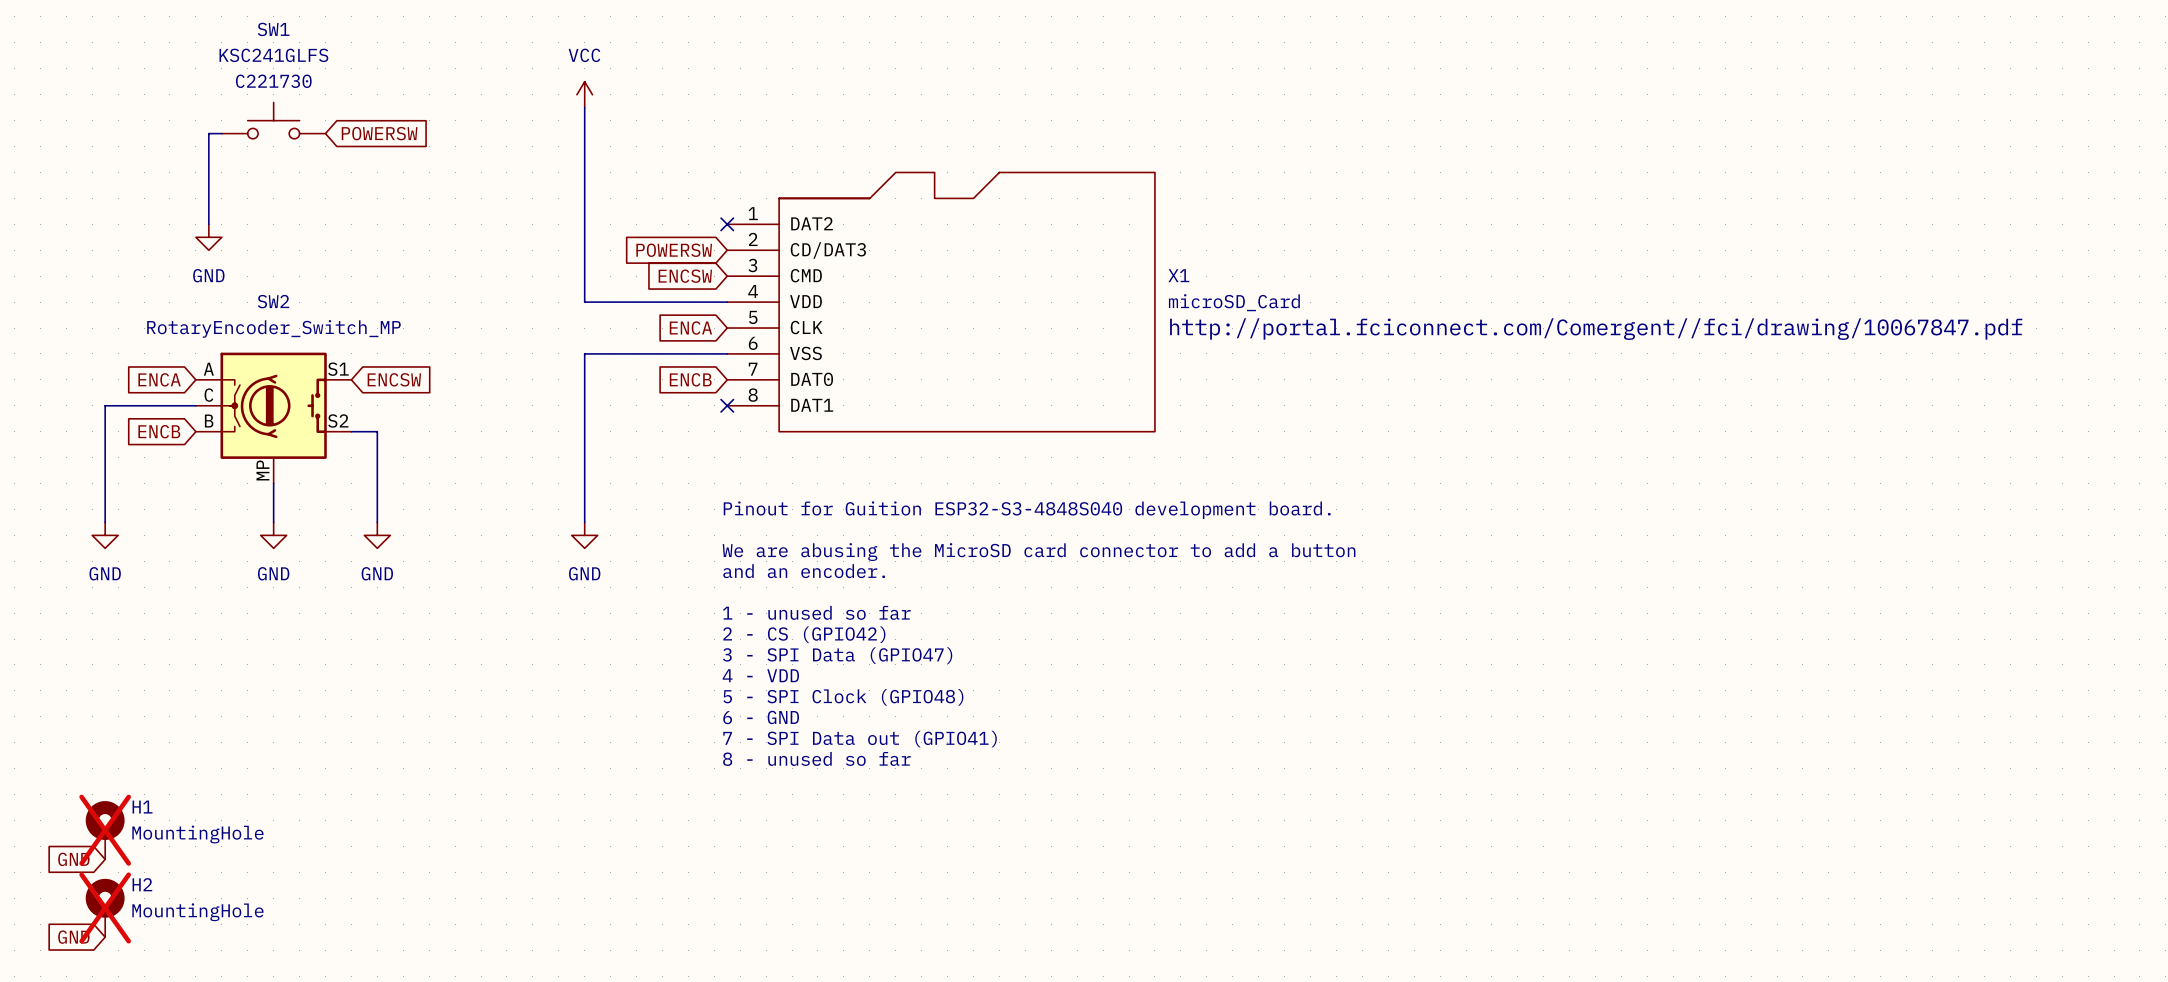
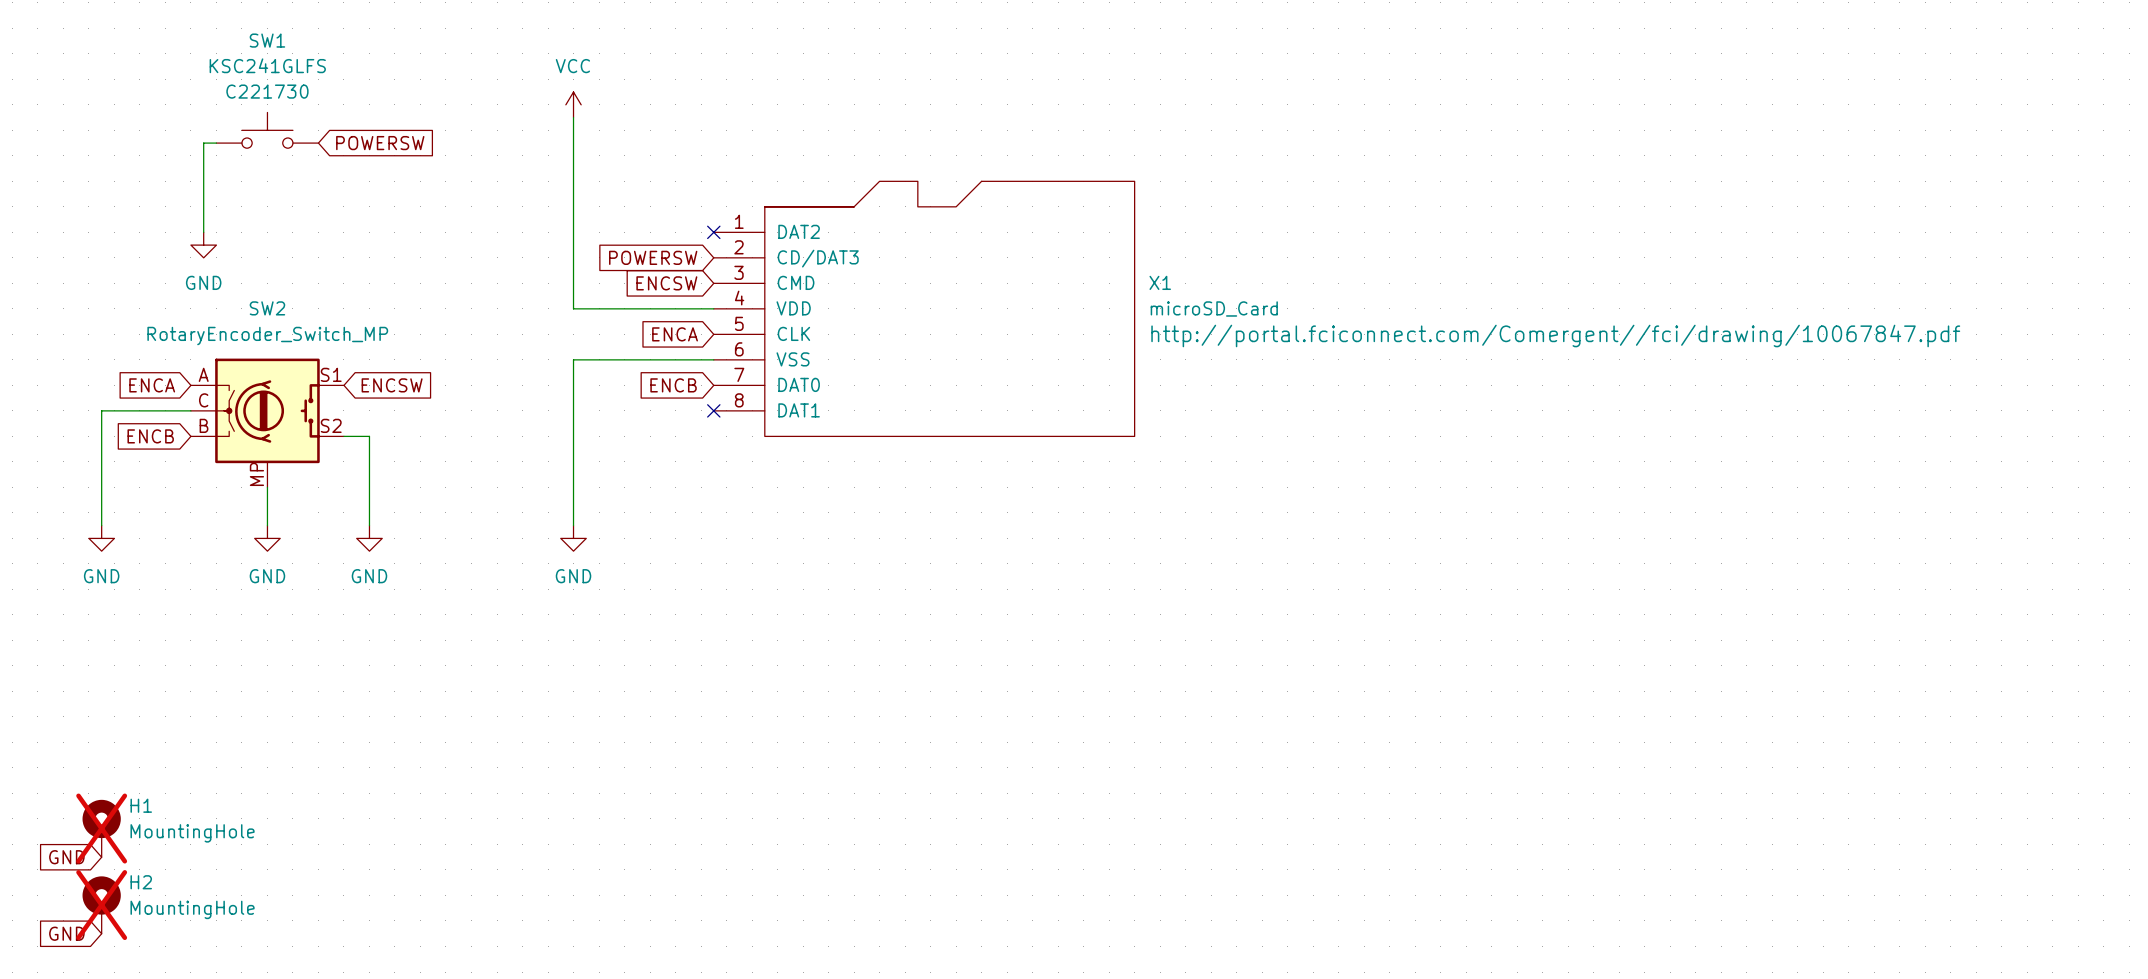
text: Pinout for Guition ESP32-S3-4848S040 development board. (1027, 510) -> none
text: We are abusing the MicroSD card connector to add a button (1039, 552) -> none
text: and an encoder. (804, 571) -> none
text: 1 - unused so far (816, 612) -> none
text: 2 - CS (GPIO42) (804, 634) -> none
text: 3 - SPI Data (GPIO47) (837, 655) -> none
text: 4 - VDD (760, 675) -> none
text: 5 - SPI Clock (GPIO48) (843, 697) -> none
text: 6 - GND (761, 717) -> none
text: 7 - SPI Data out (GPIO41) (860, 739) -> none
text: 8 - unused so far (816, 758) -> none

